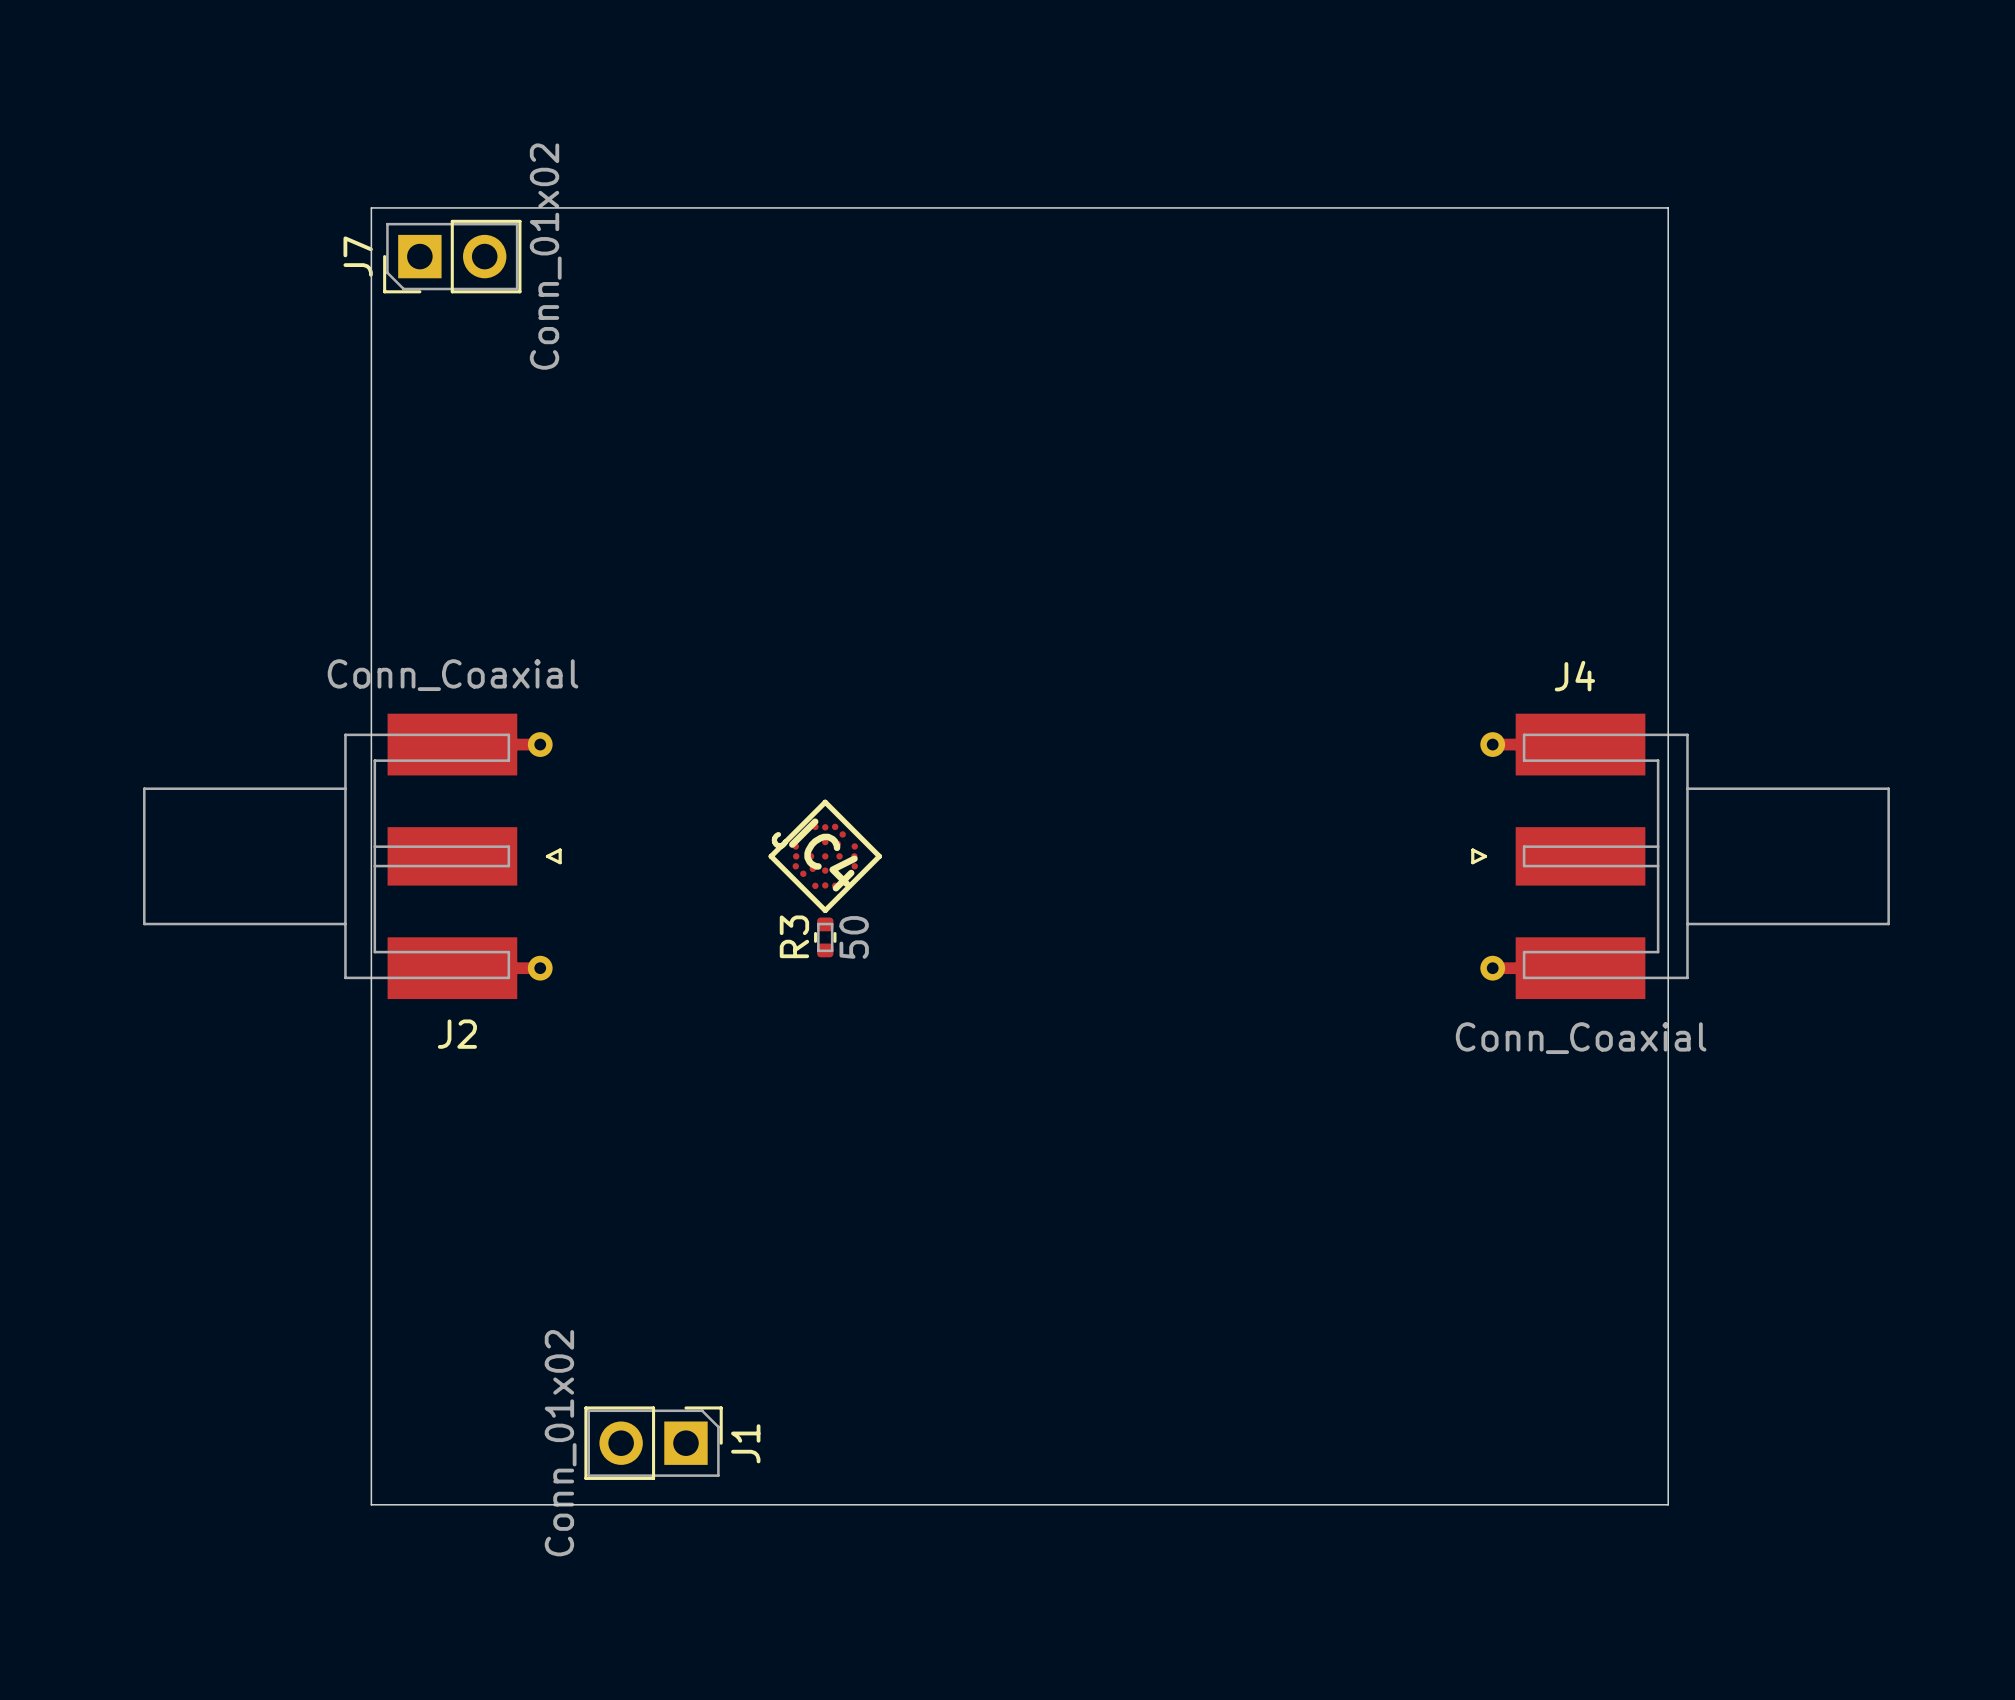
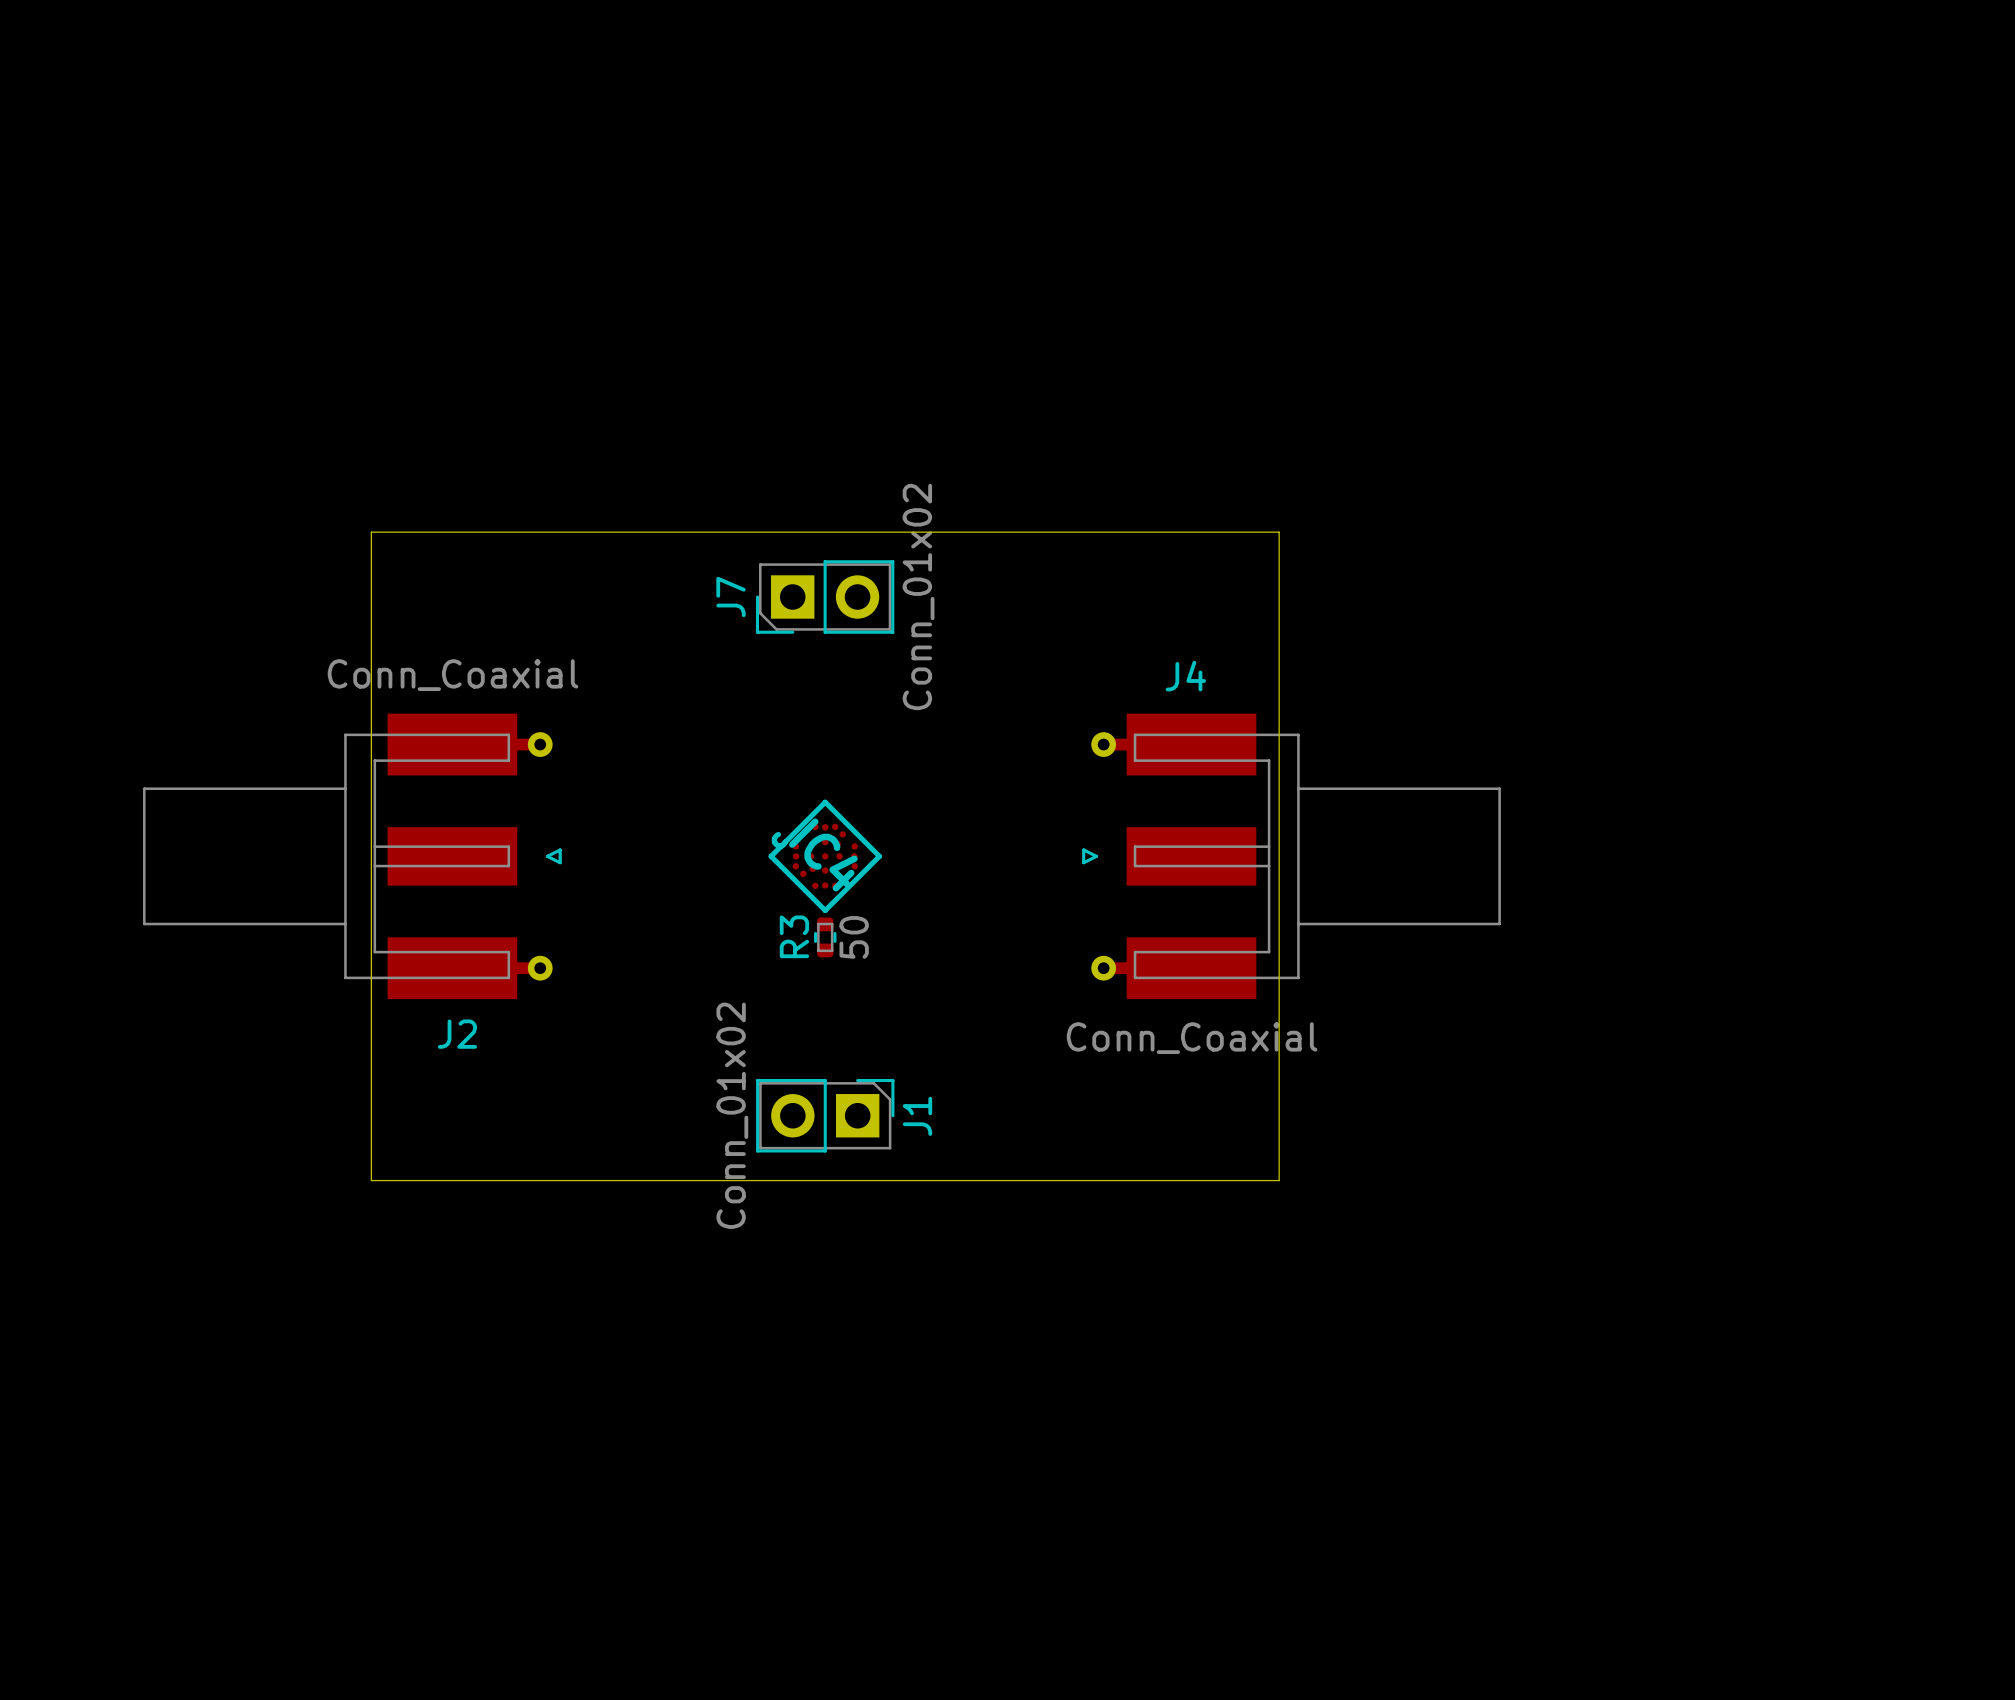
J7 position: (452, 256) -> (825, 597)
board edge: (371, 532) (371, 207) (1668, 207) (1668, 1504) (371, 1504) (371, 1180) -> (371, 532) (1279, 532) (1279, 1180) (371, 1180)
J4 position: (1680, 856) -> (1291, 856)
J1 position: (653, 1443) -> (825, 1115)

